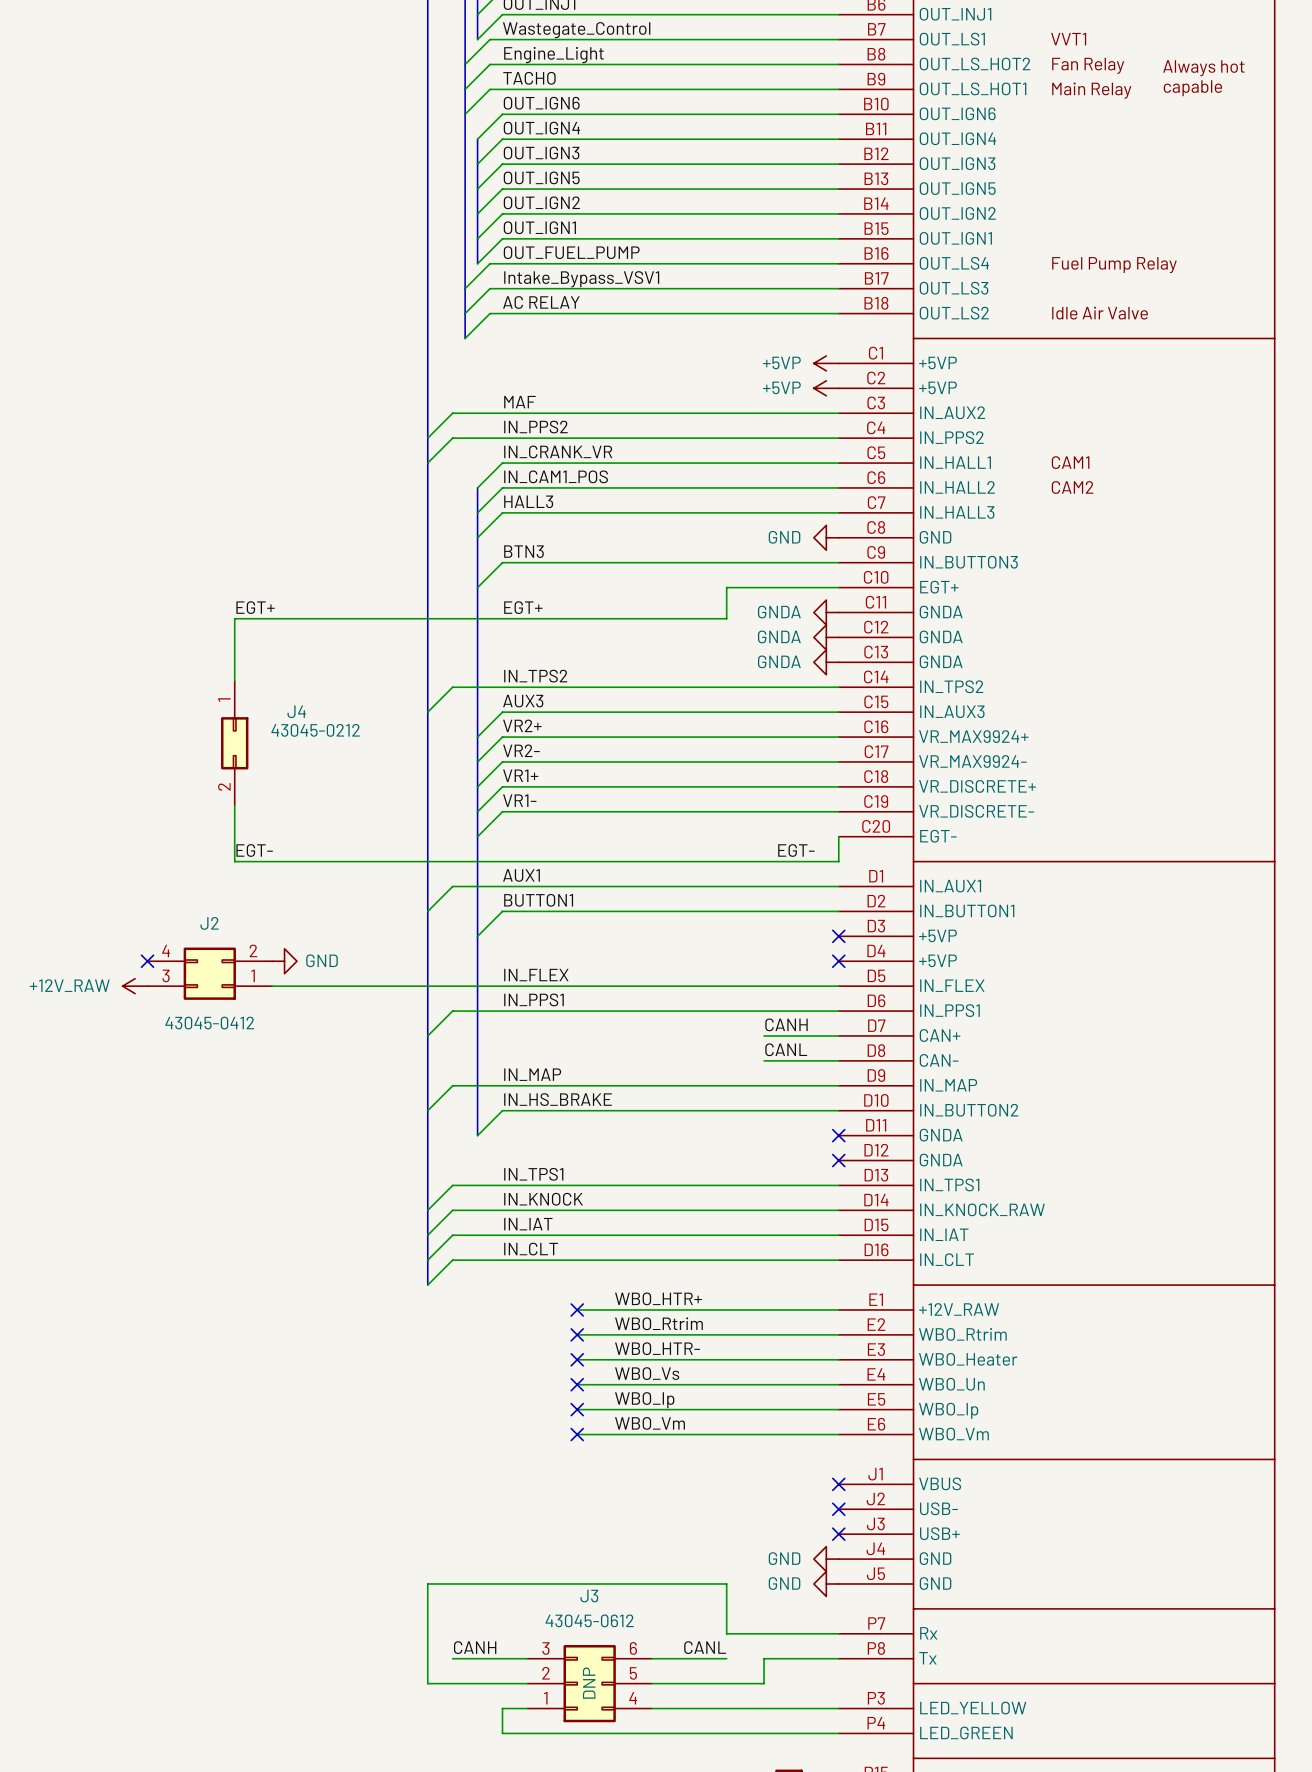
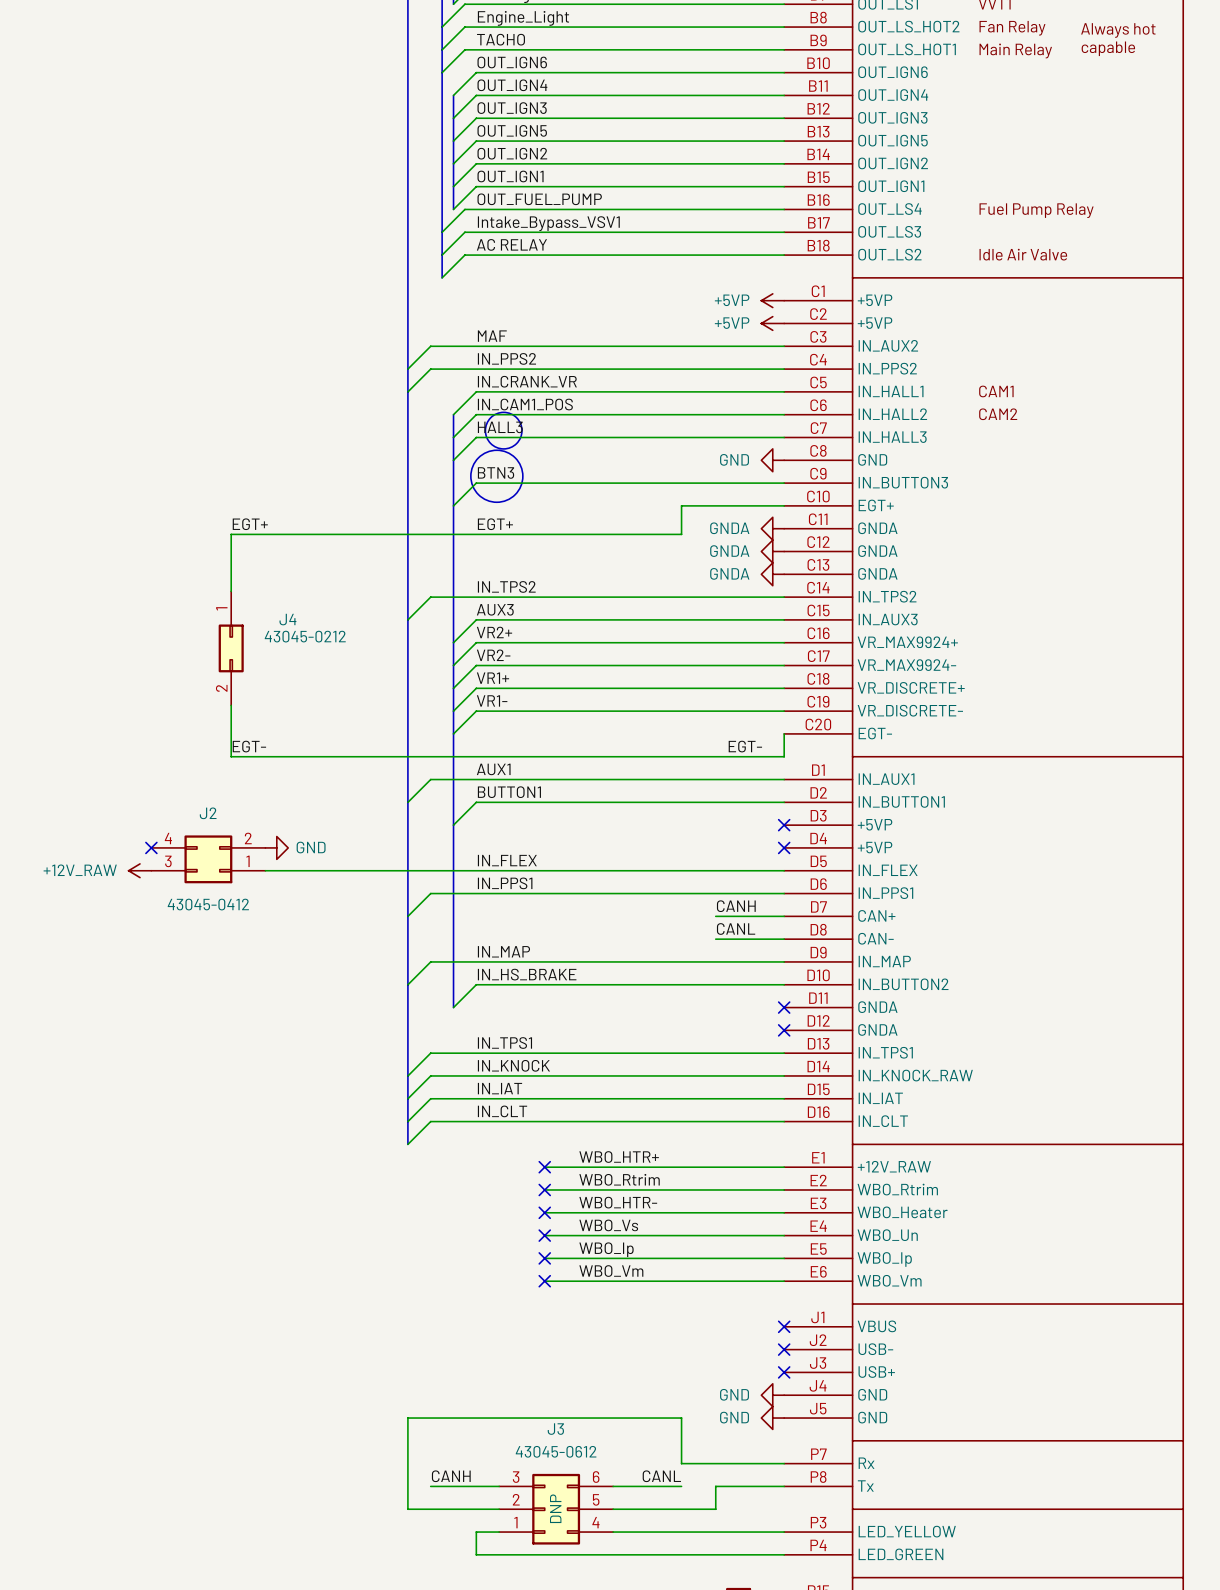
drawing: none -> [470, 412, 523, 503]

